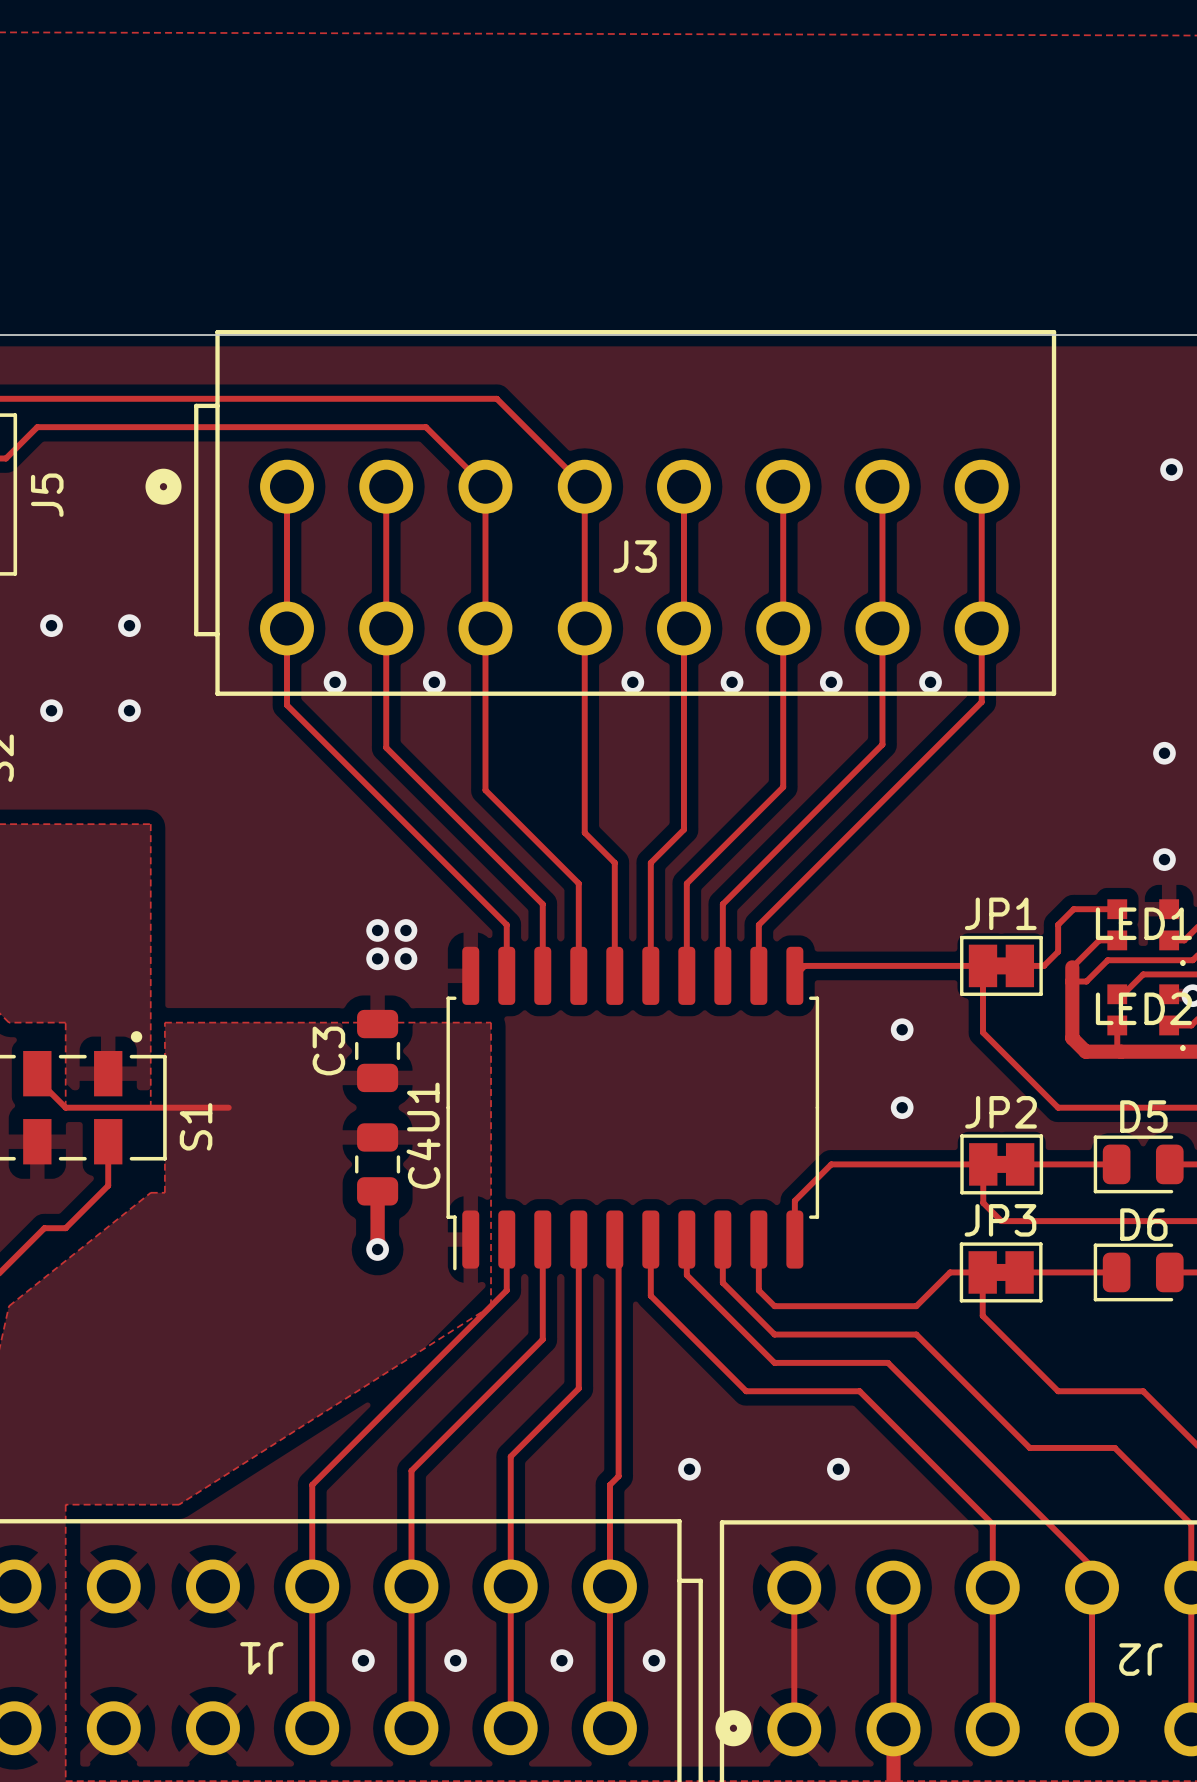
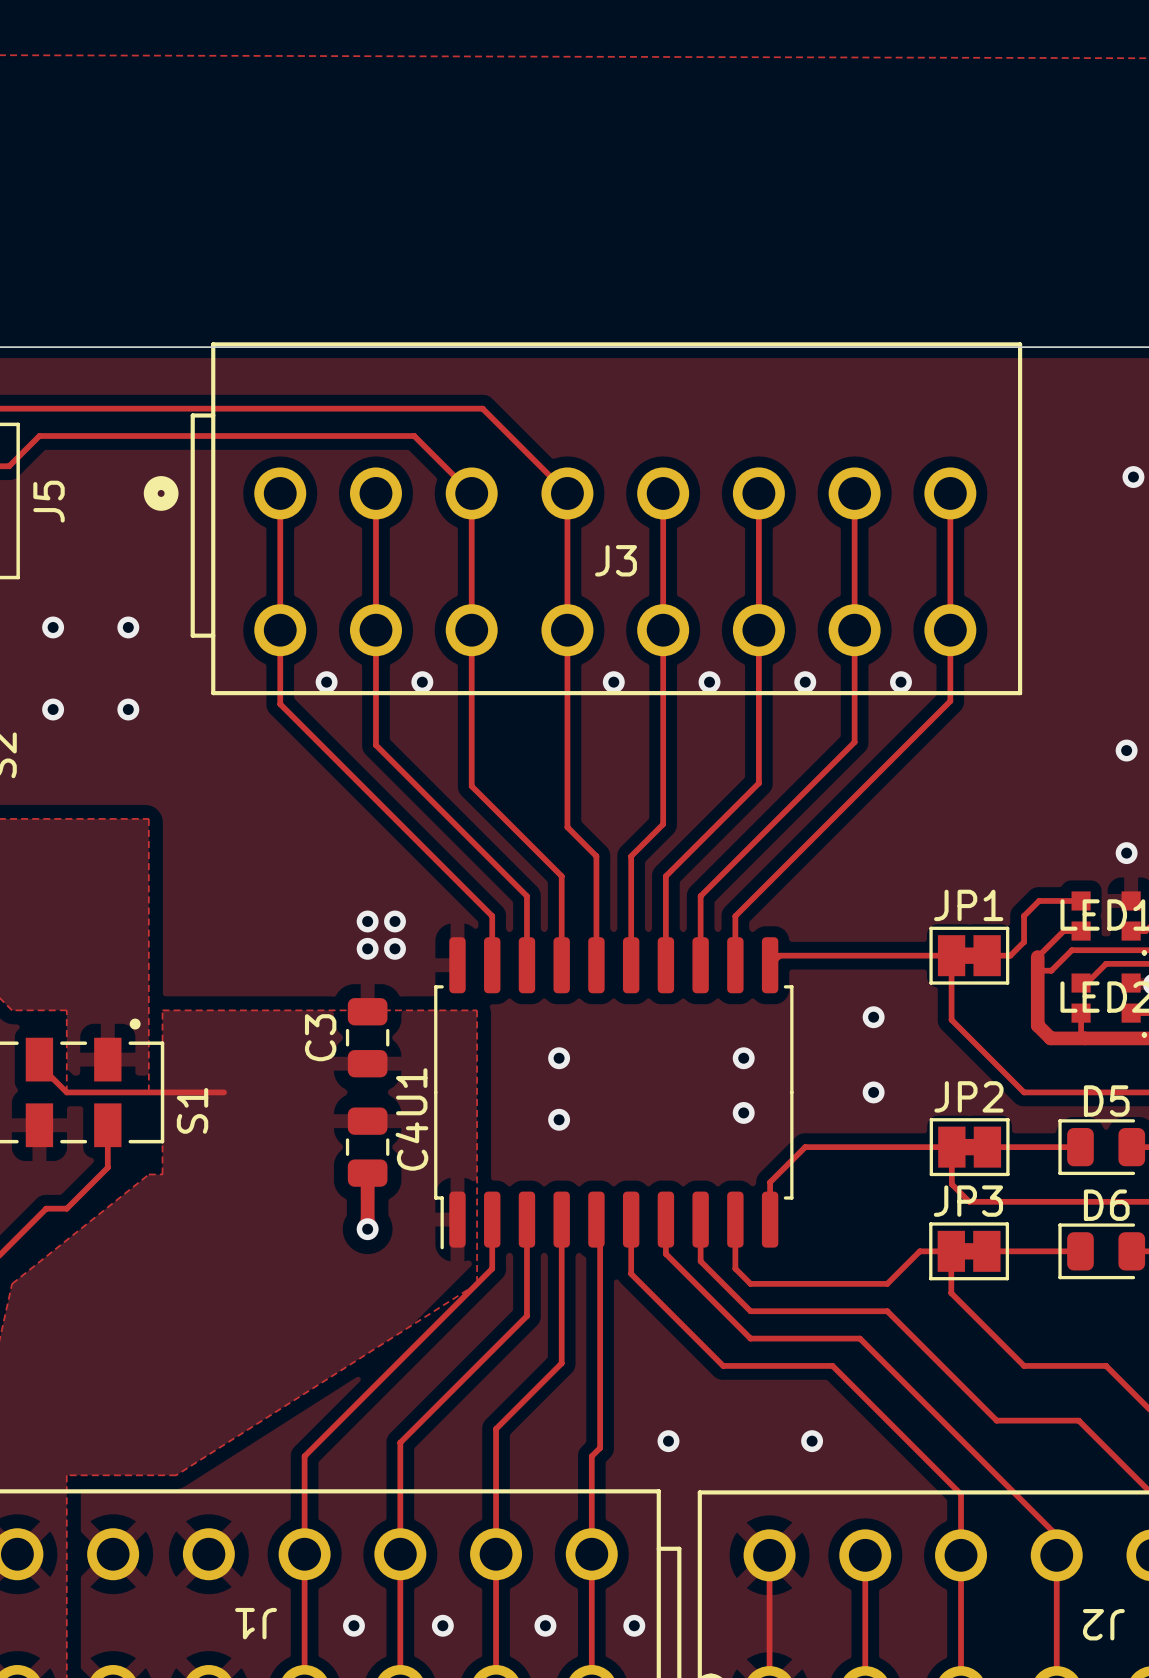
via: none -> (559, 1058)
via: none -> (743, 1058)
via: none -> (743, 1112)
via: none -> (559, 1119)

